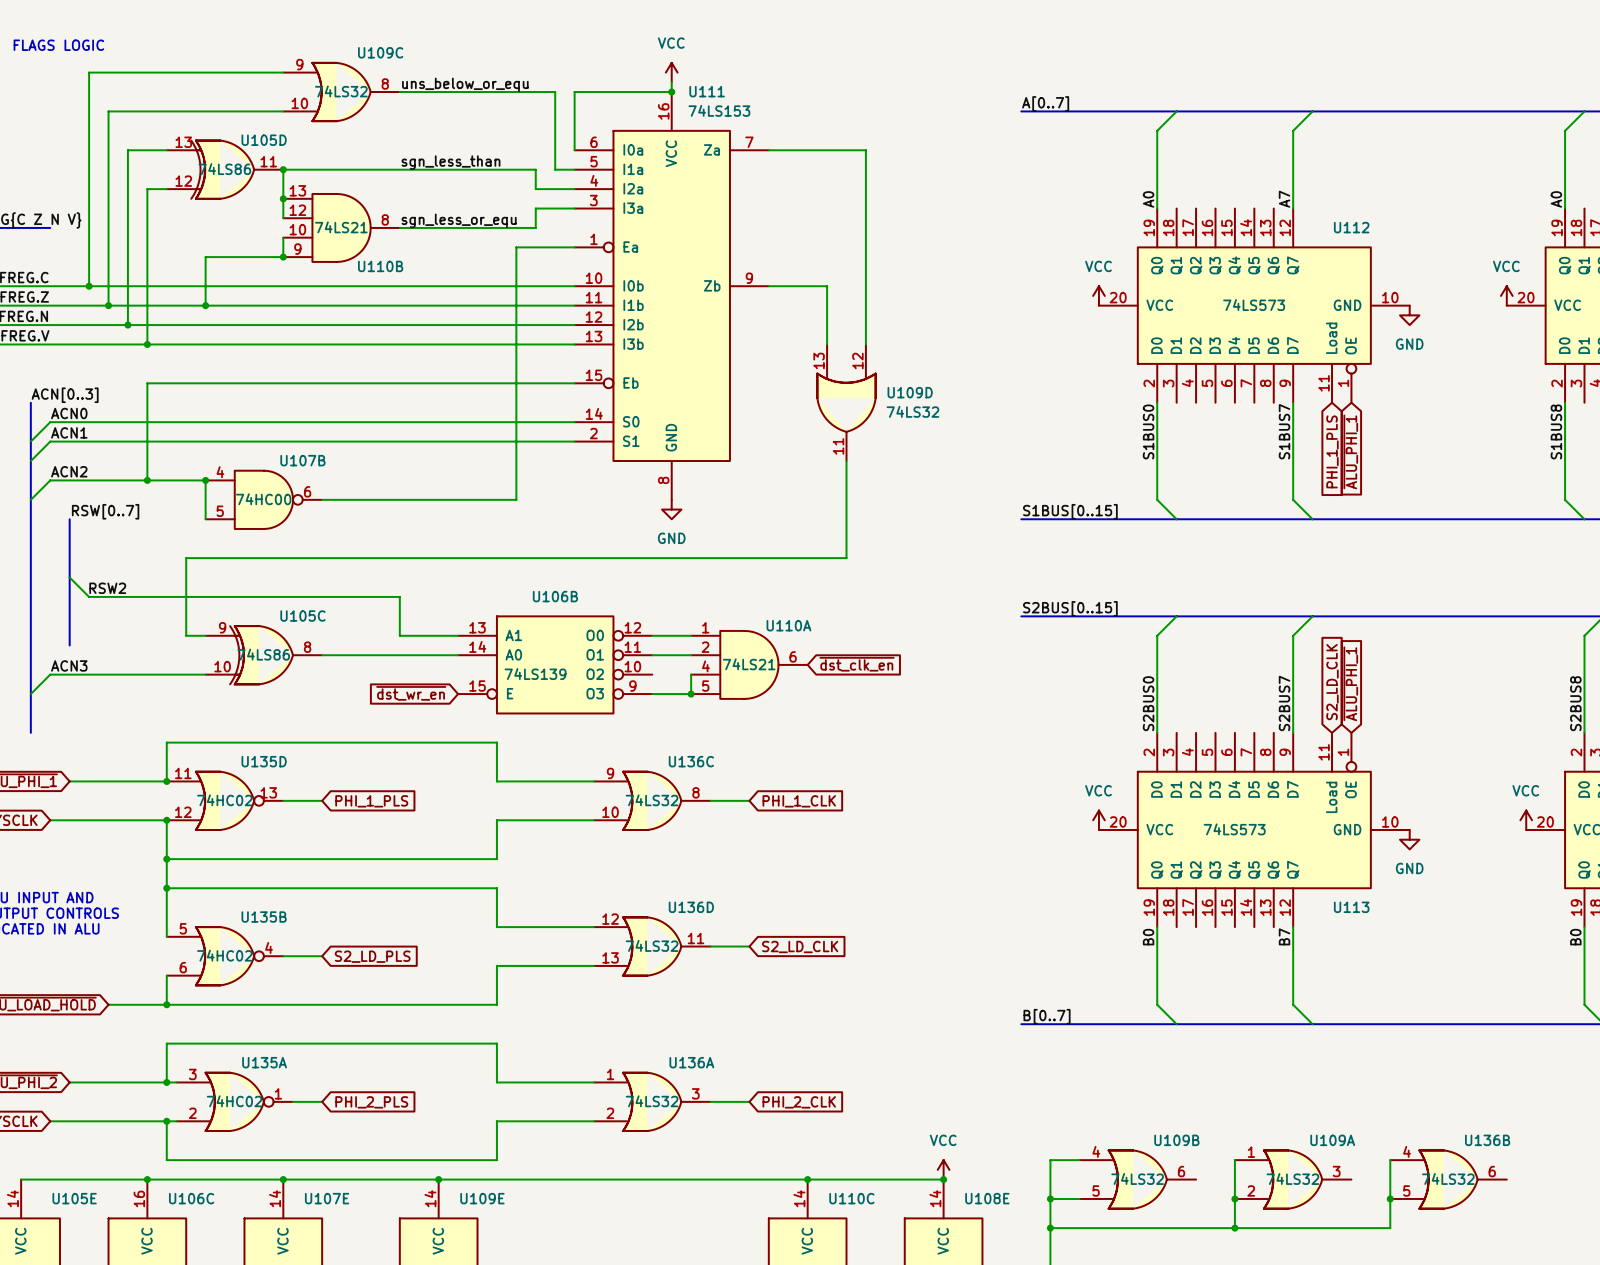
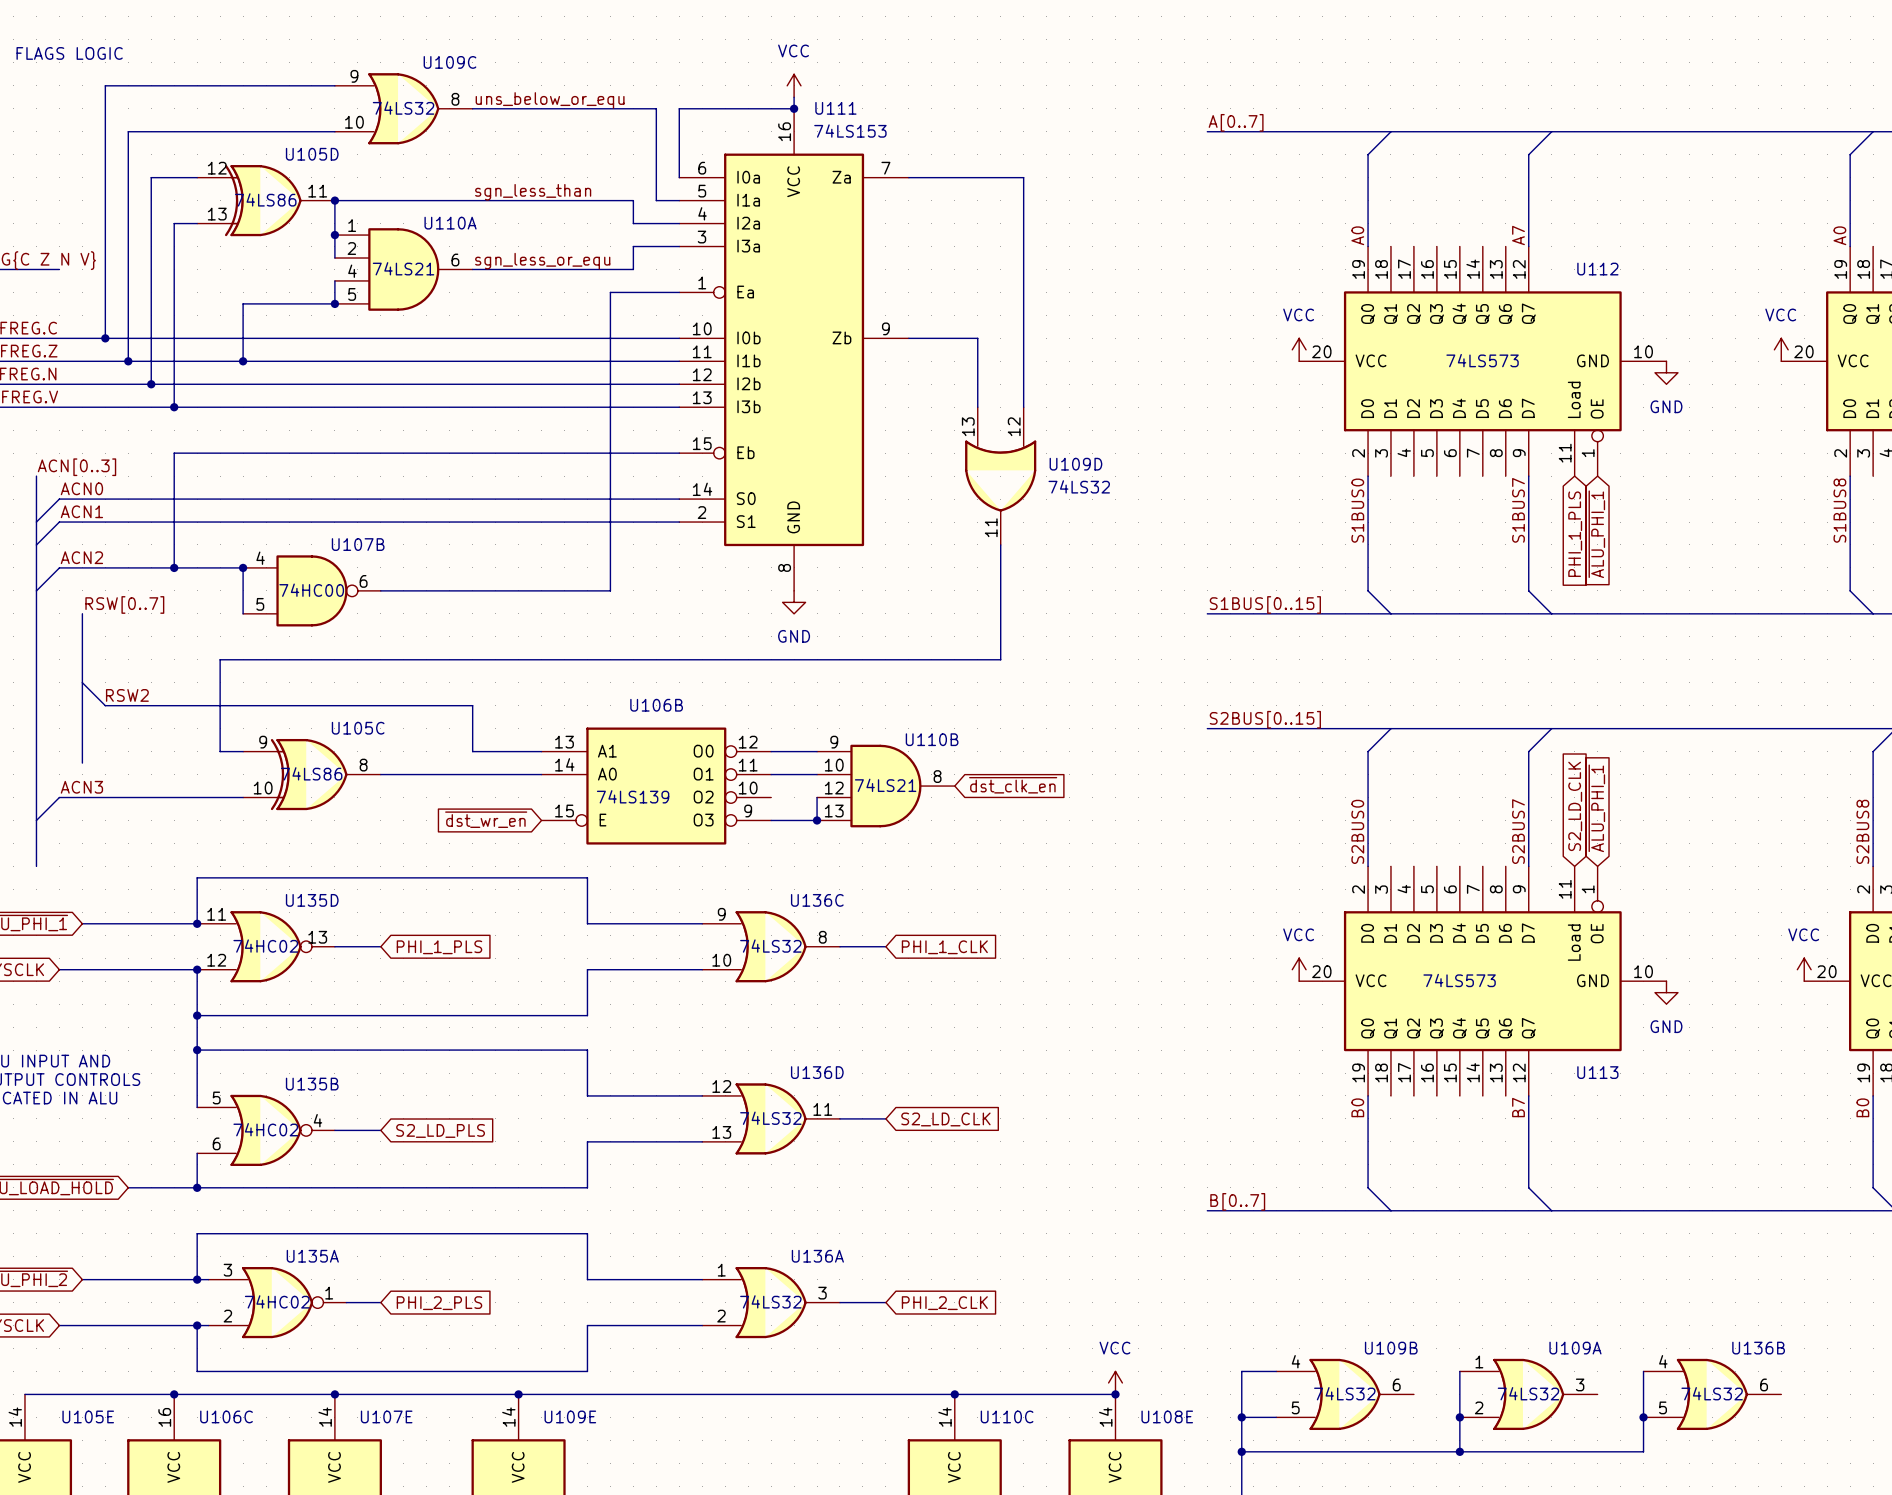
U105D flip: as is (222, 169) -> up-down (263, 200)
U110B flip: as is (341, 227) -> up-down (885, 786)
U110B position: (341, 227) -> (885, 786)
U110A position: (749, 664) -> (403, 269)

